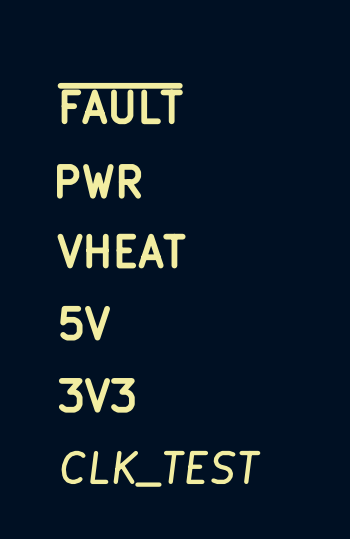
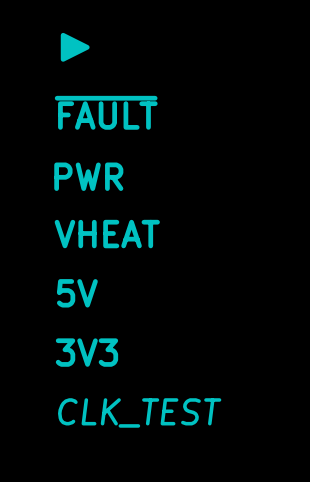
drawing: none -> [60, 32, 90, 62]

